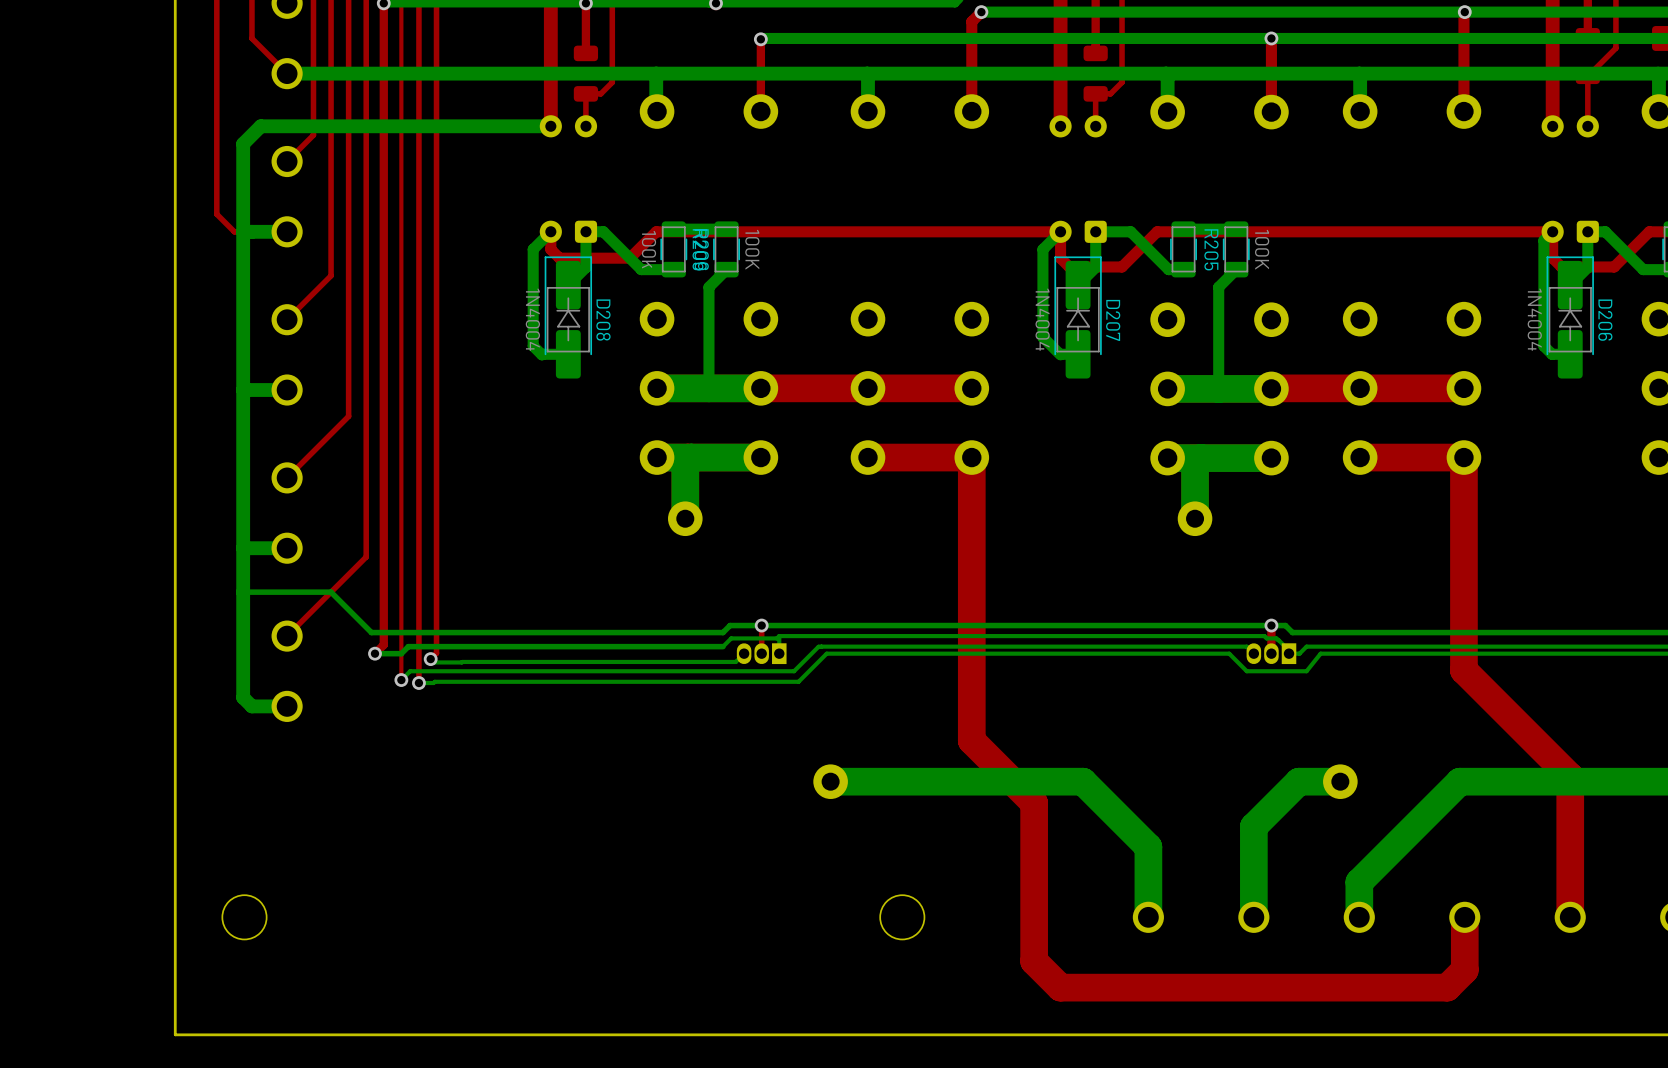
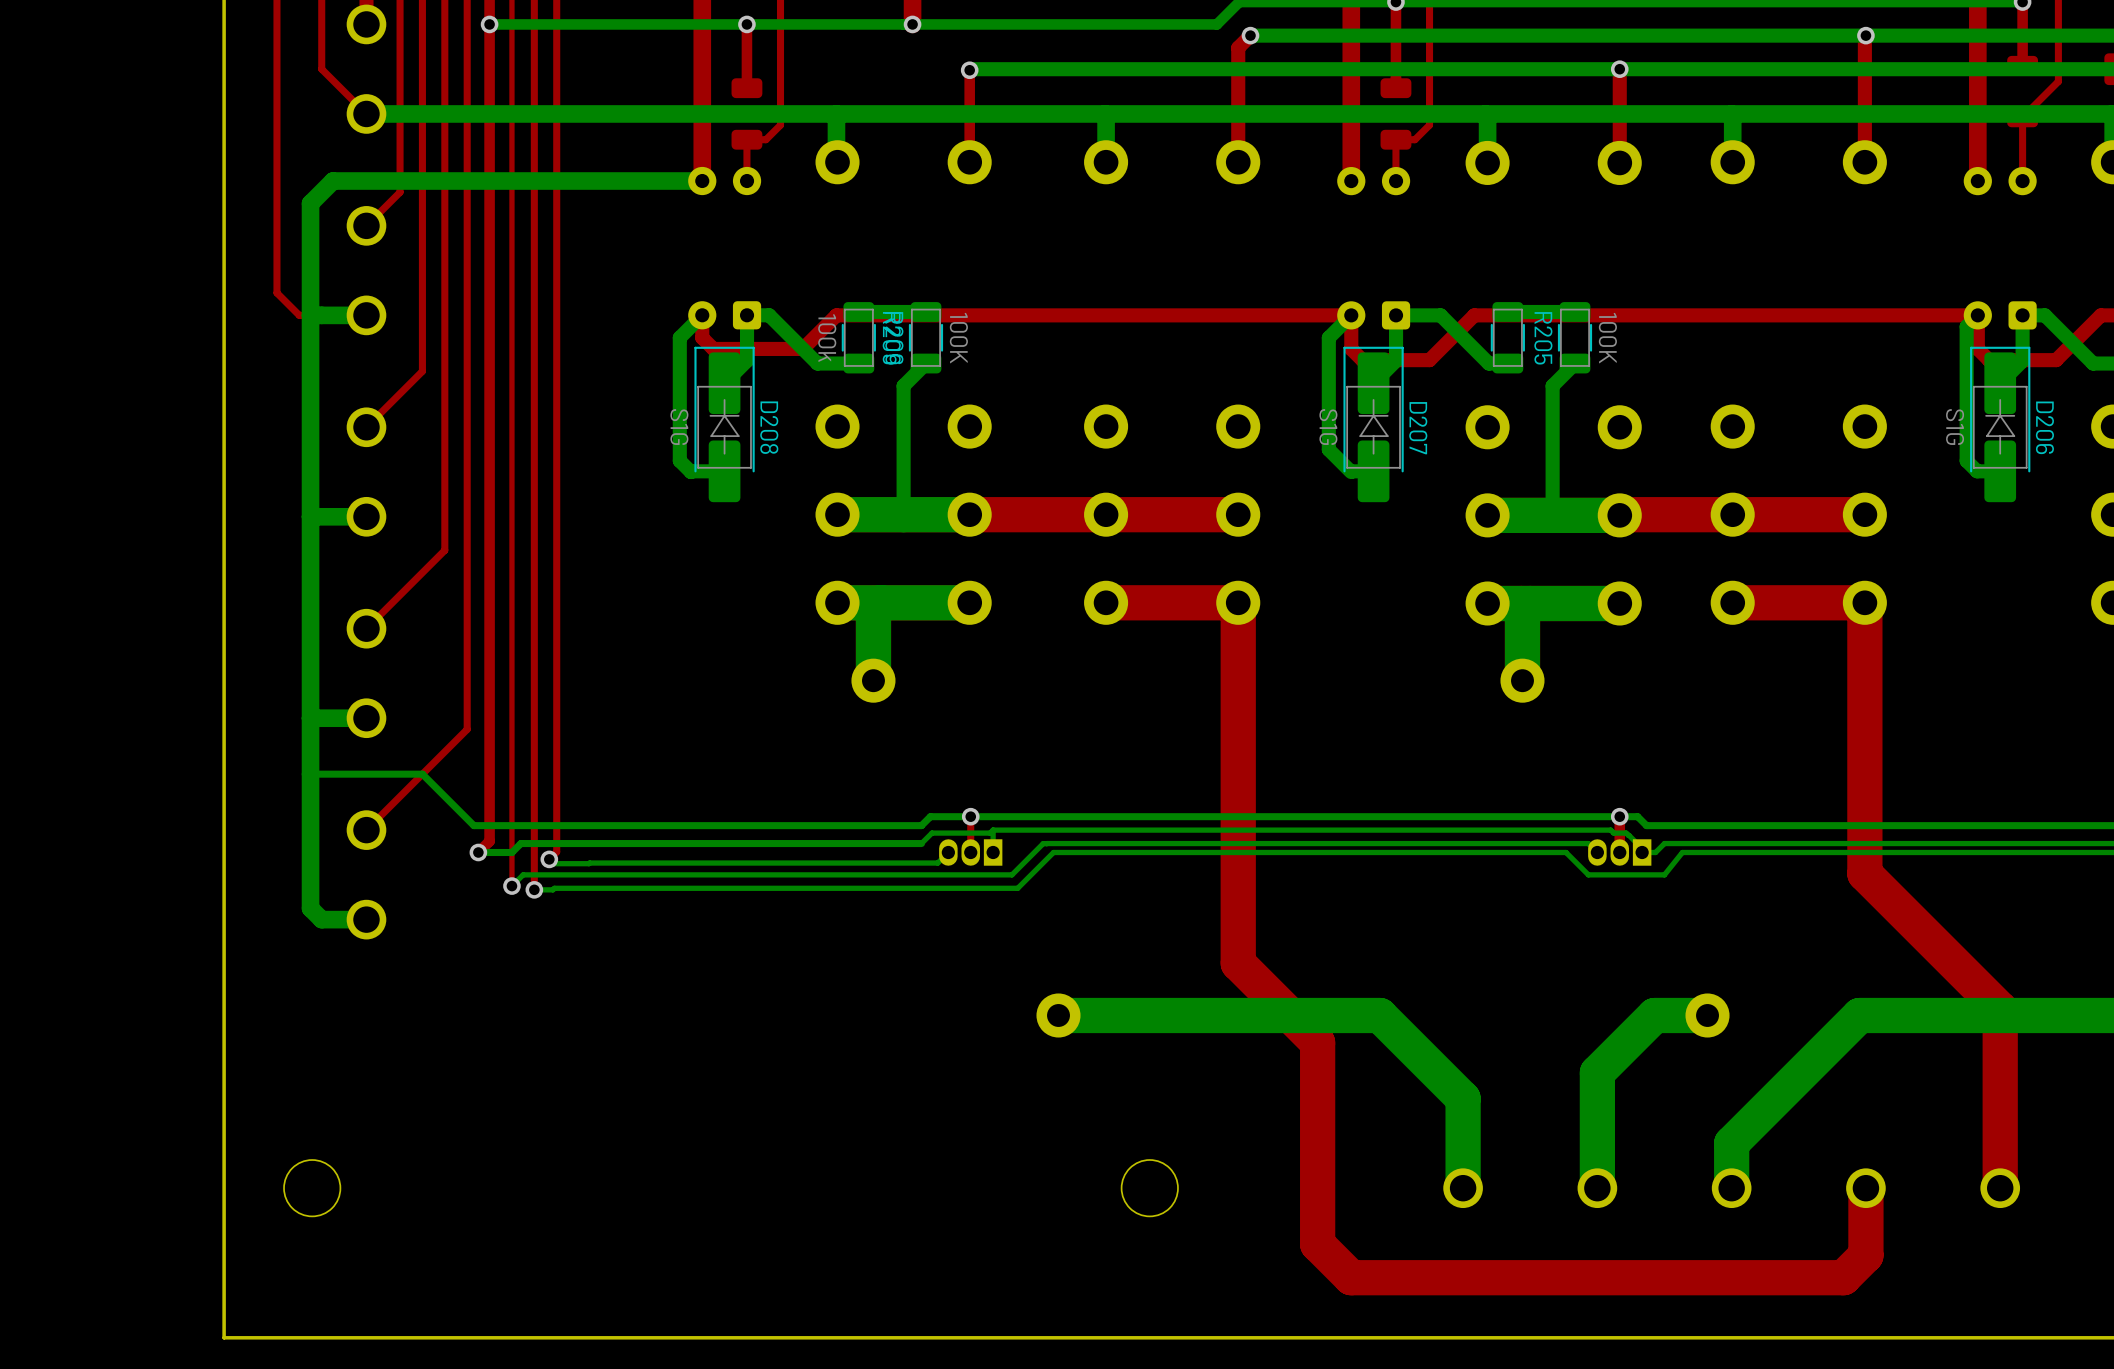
D208 value: 1N4004 (532, 319) -> S1G (679, 427)
D207 value: 1N4004 (1042, 319) -> S1G (1328, 427)
D206 value: 1N4004 (1534, 319) -> S1G (1955, 427)

